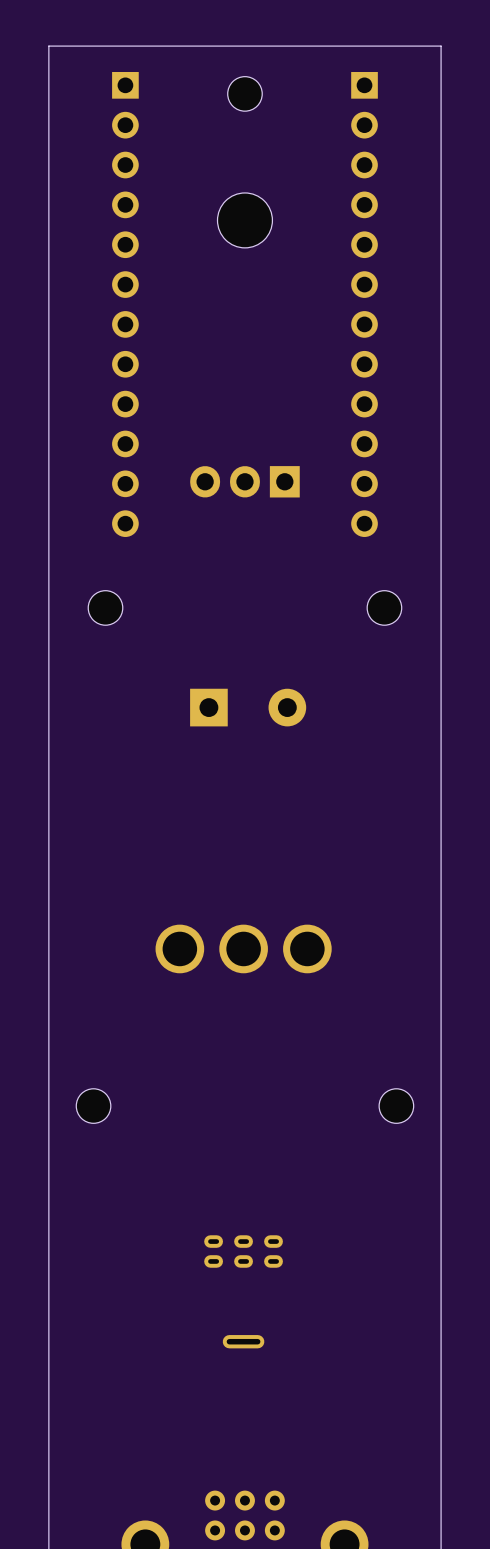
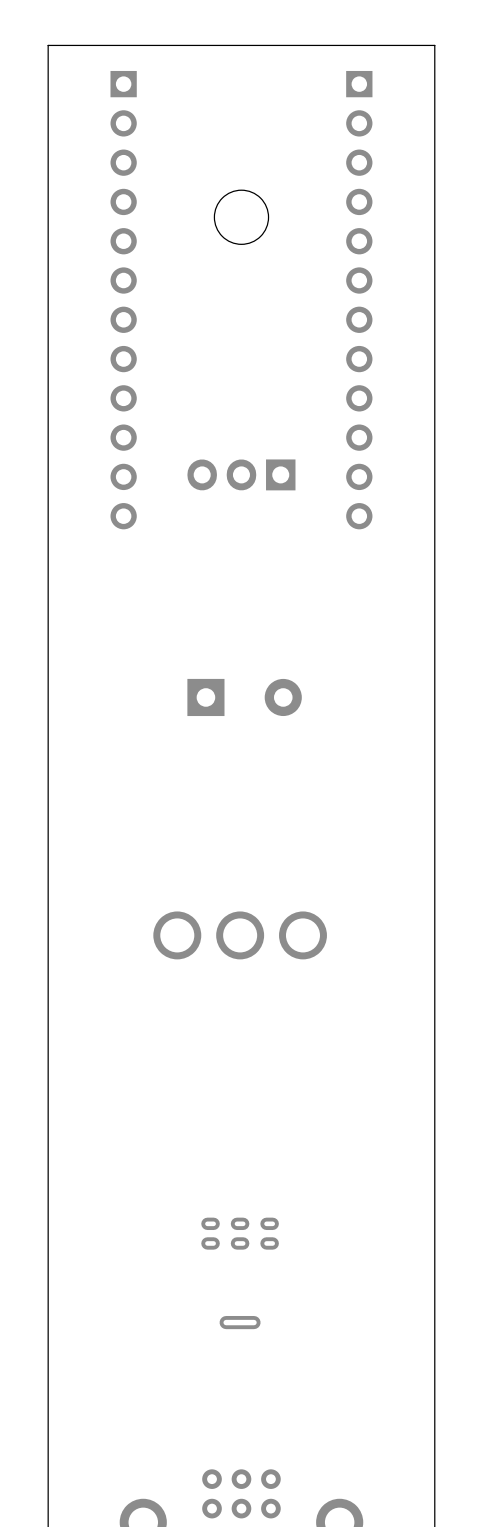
part: (244, 93) -> none
part: (105, 607) -> none
part: (384, 607) -> none
part: (93, 1106) -> none
part: (396, 1106) -> none

